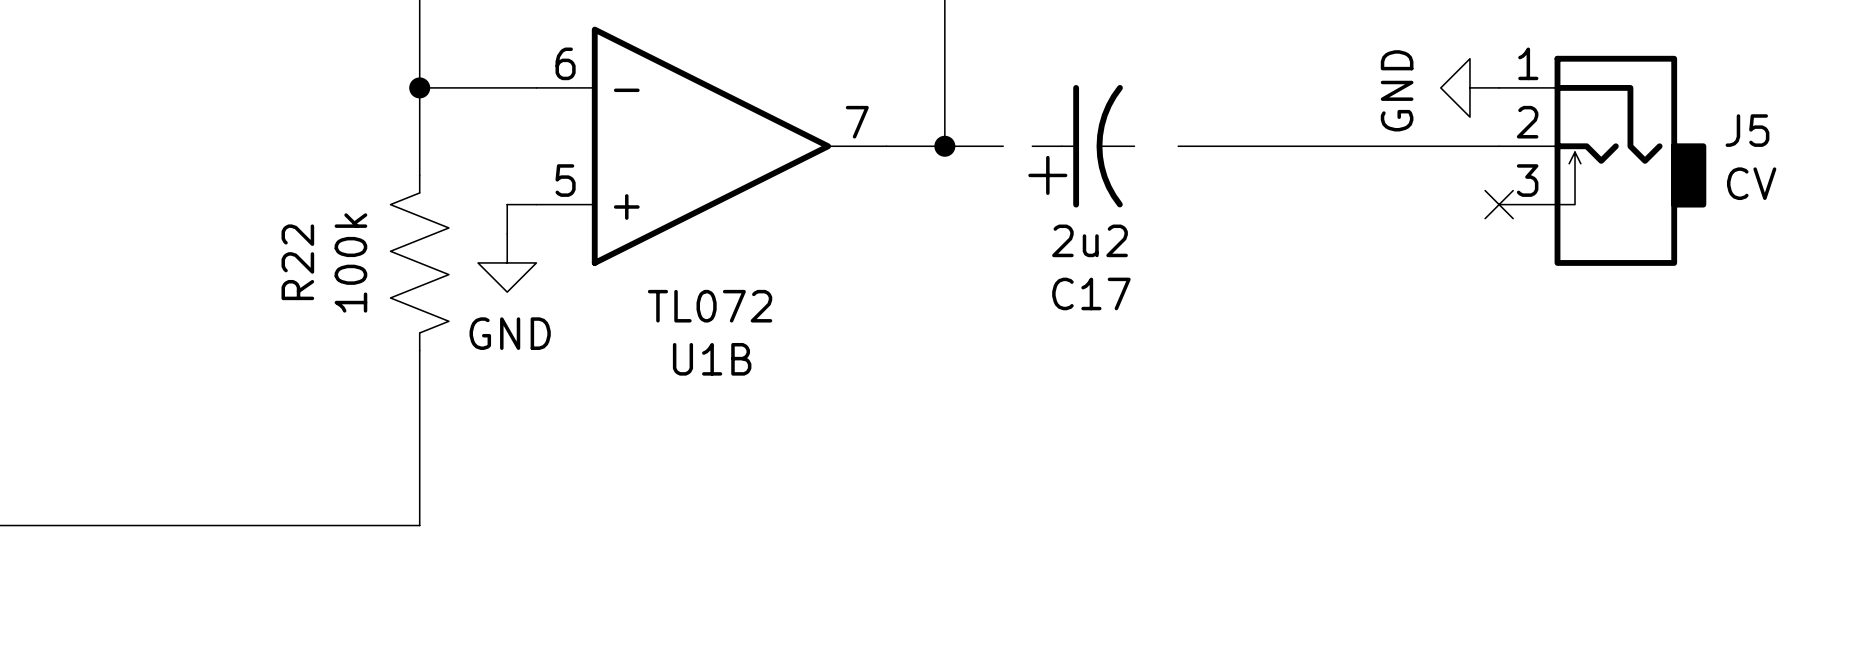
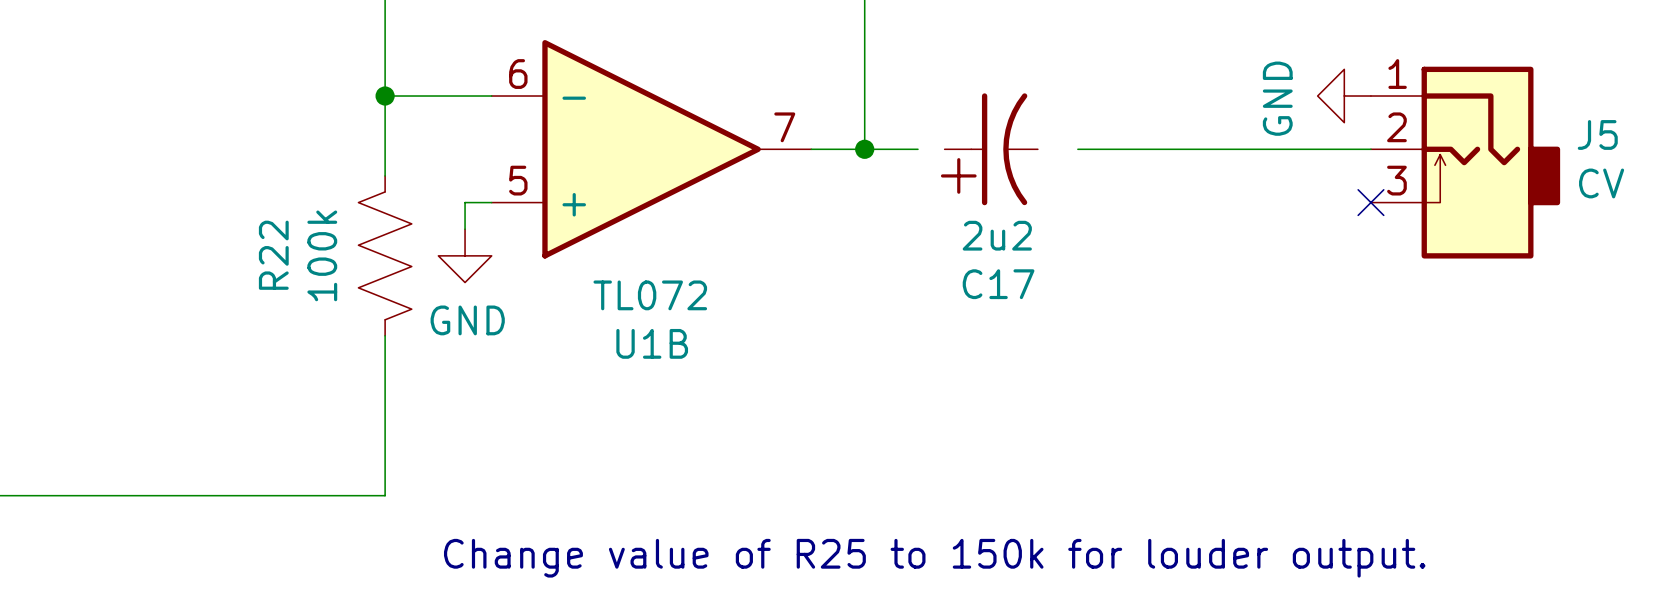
text: none -> Change value of R25 to 150k for louder output. (934, 558)

